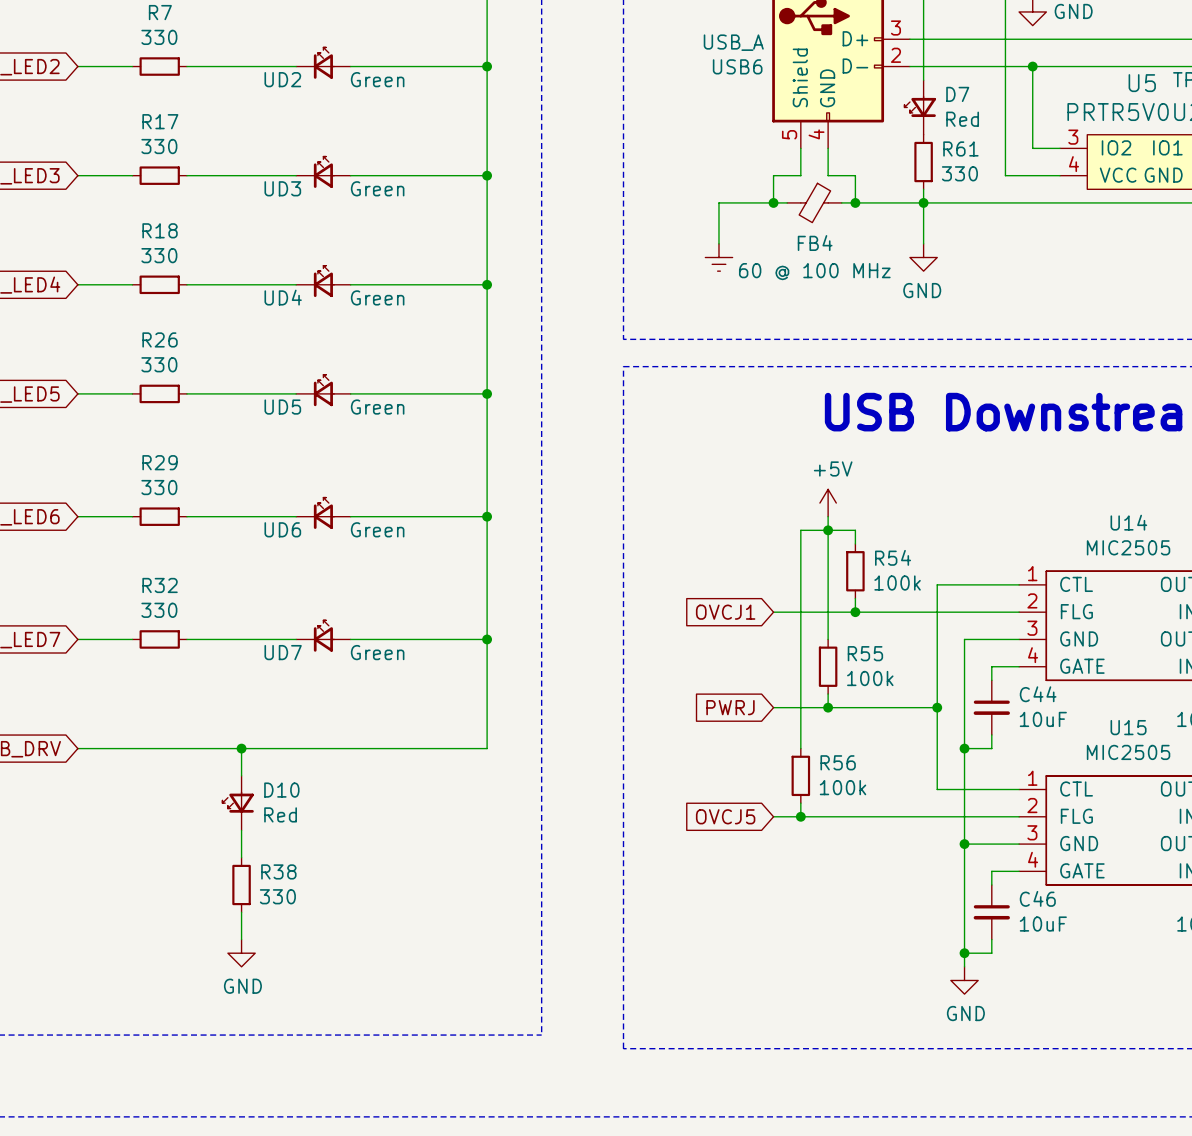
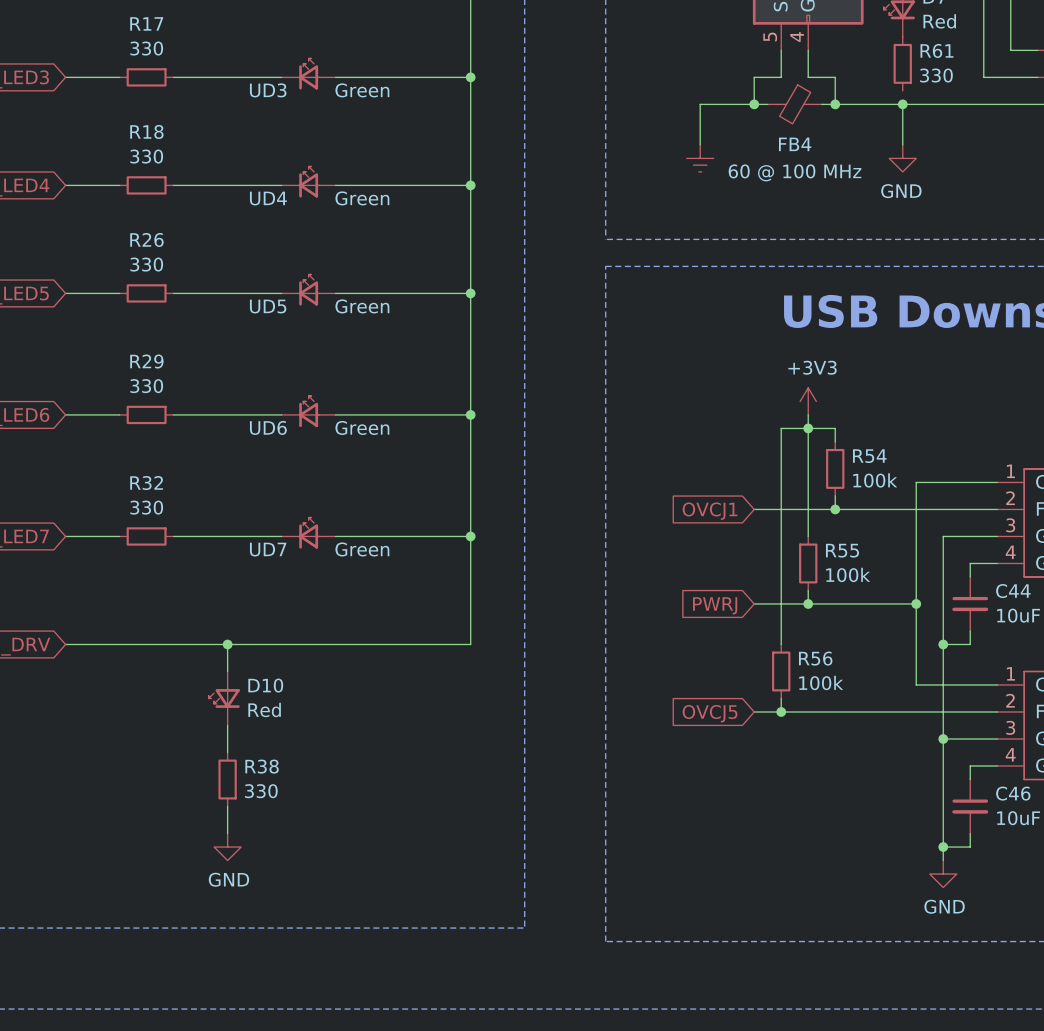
wire: (923, 189) (923, 202) -> none
power symbol: +5V (828, 503) -> +3V3 (808, 401)

